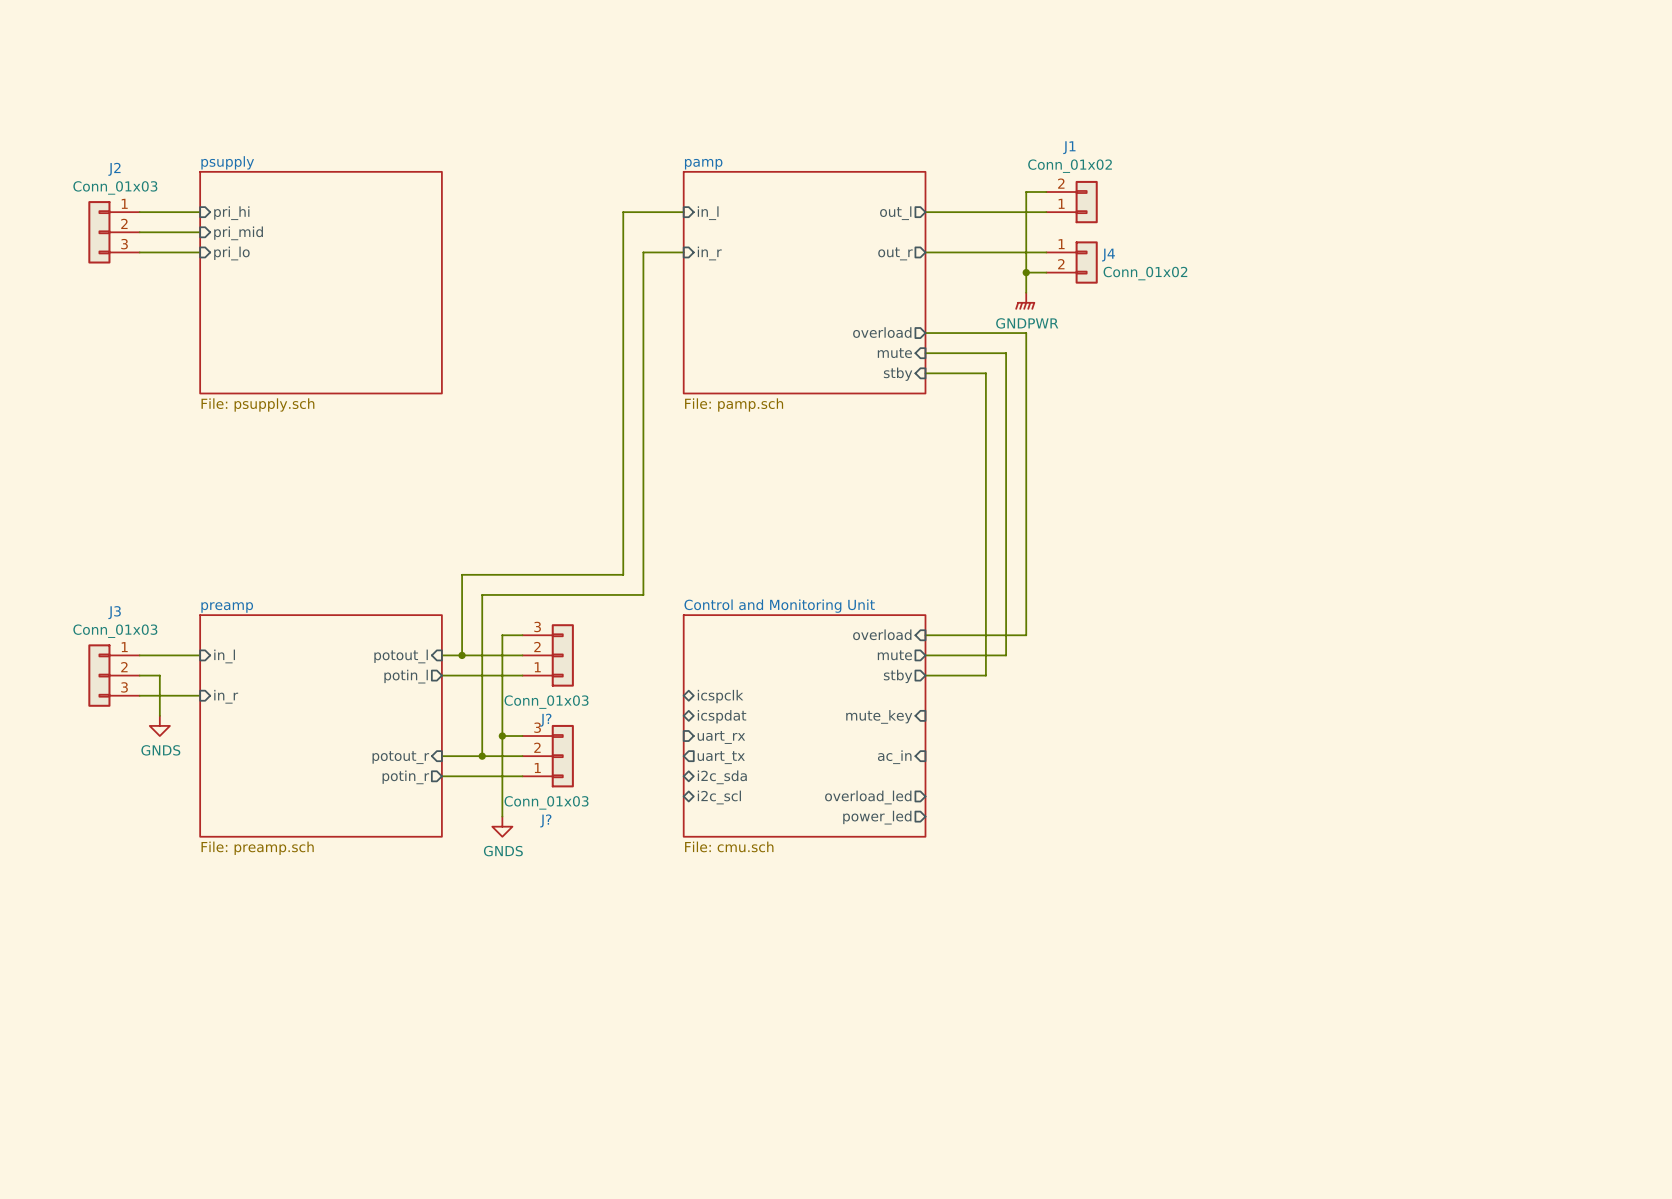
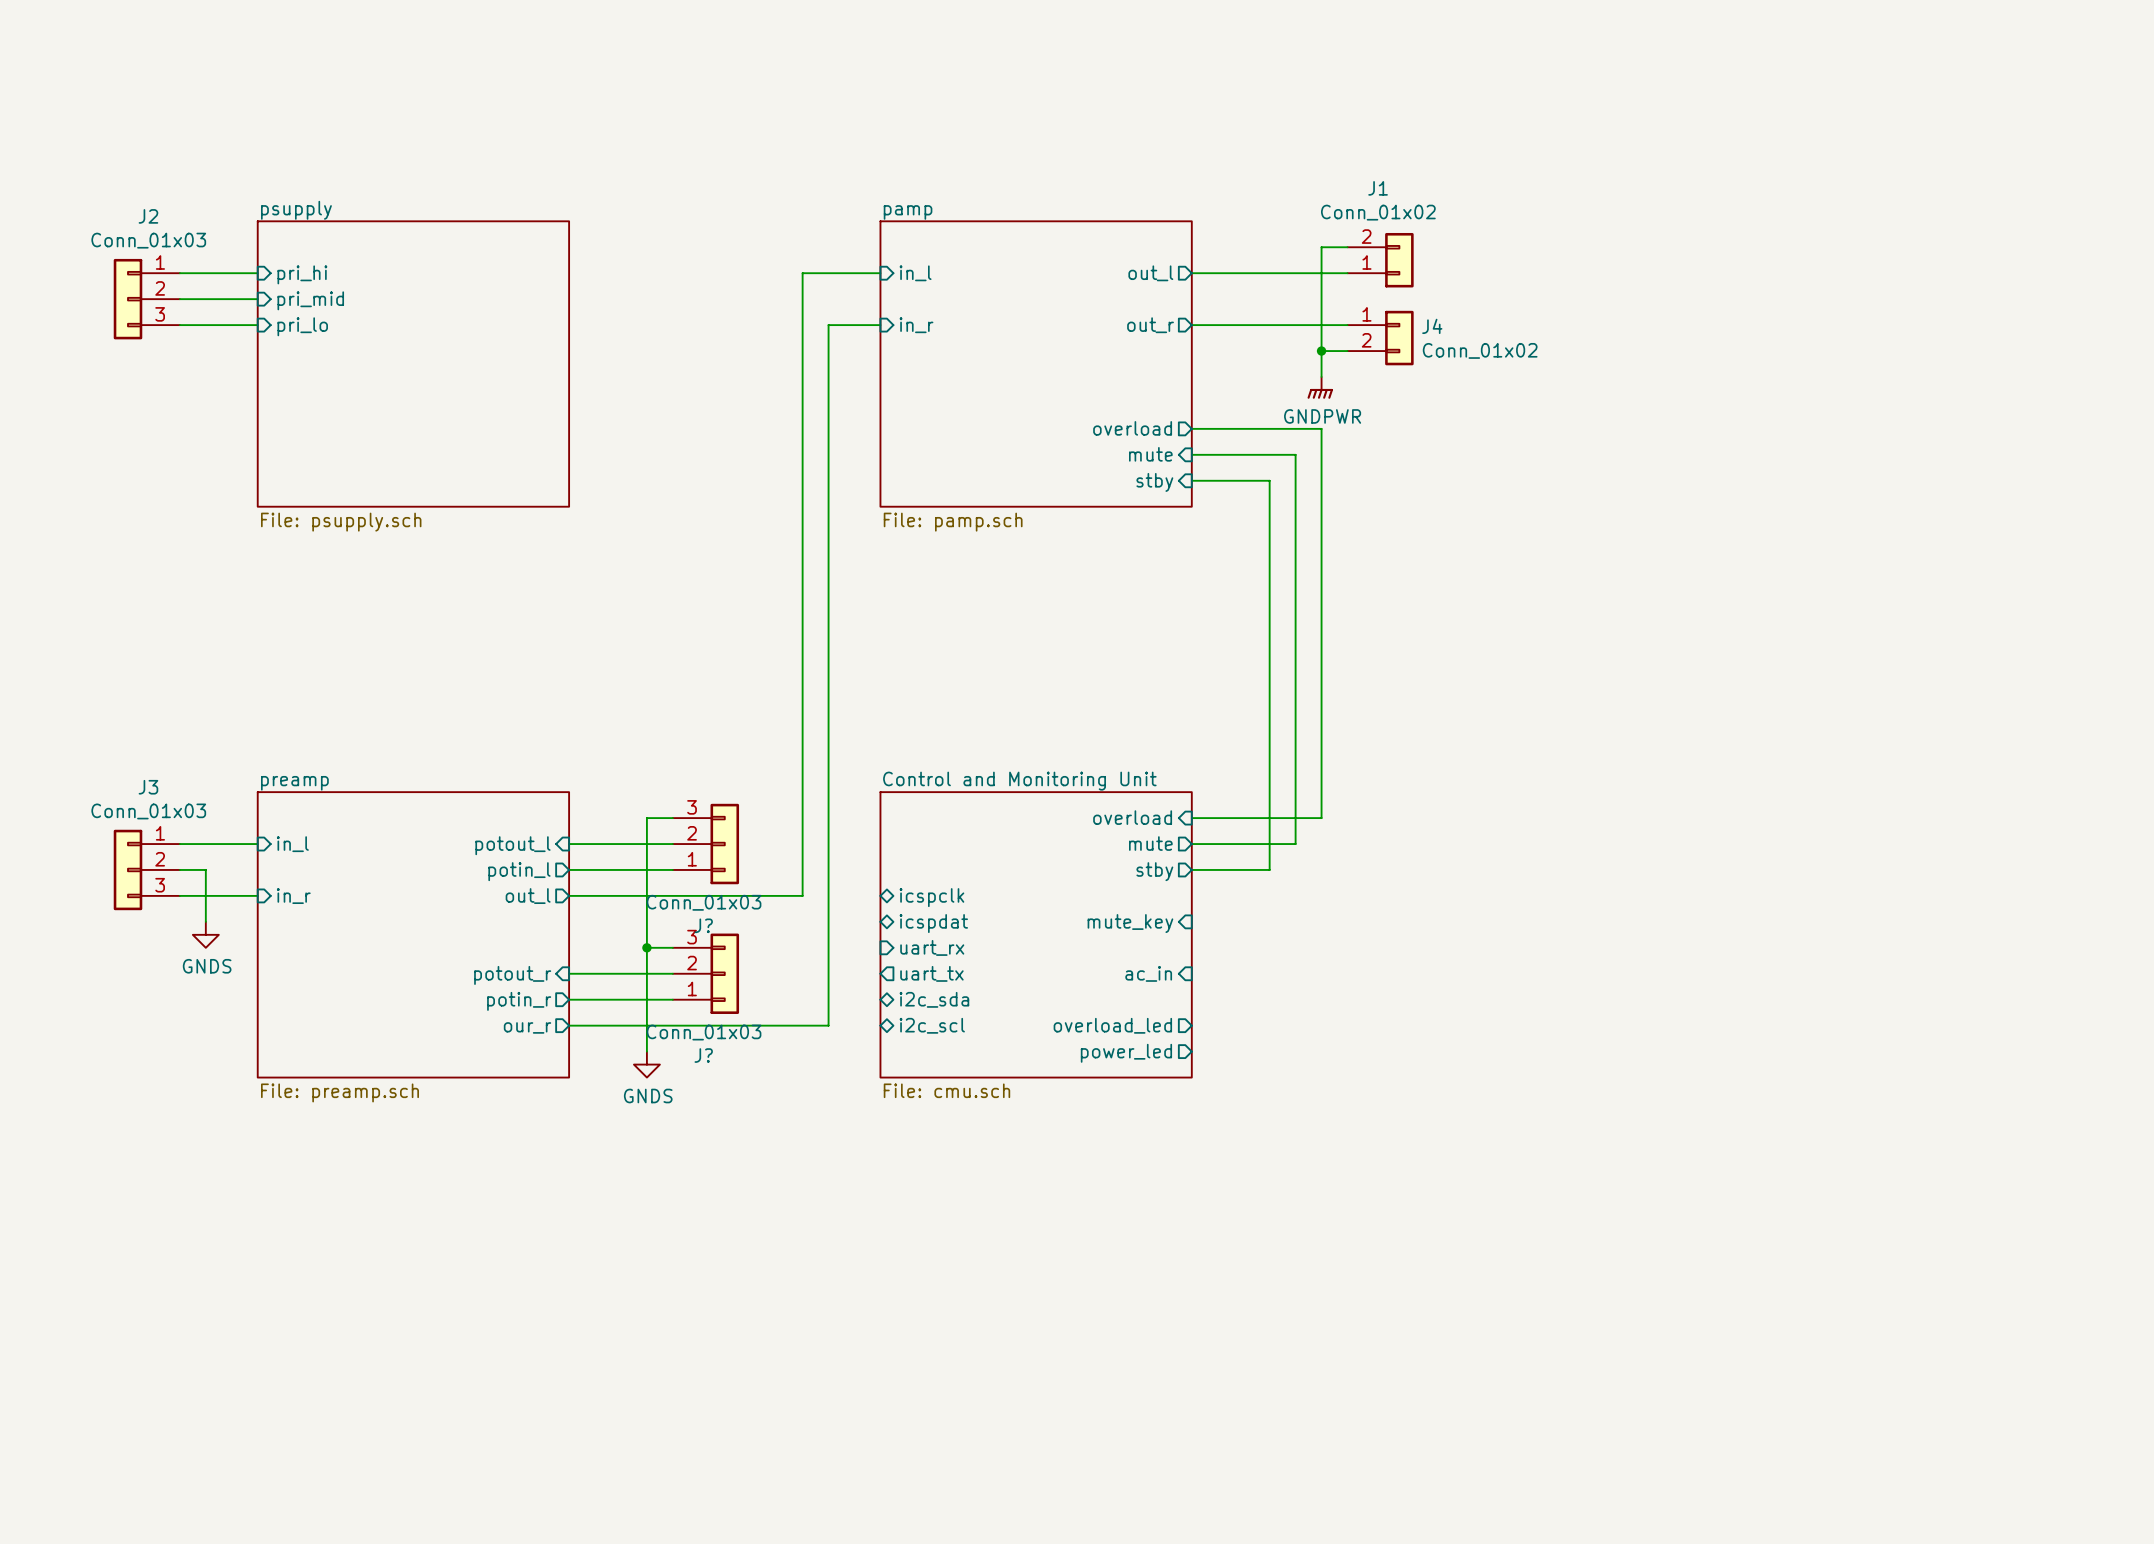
wire: (623, 574) (462, 574) (462, 655) -> (802, 740) (802, 895) (569, 895)
wire: (643, 594) (482, 594) (482, 756) -> (828, 766) (828, 1025) (569, 1025)
junction: (462, 655) -> none
sheet pin: none -> out_l (528, 896)
junction: (482, 756) -> none
sheet pin: none -> our_r (527, 1027)

